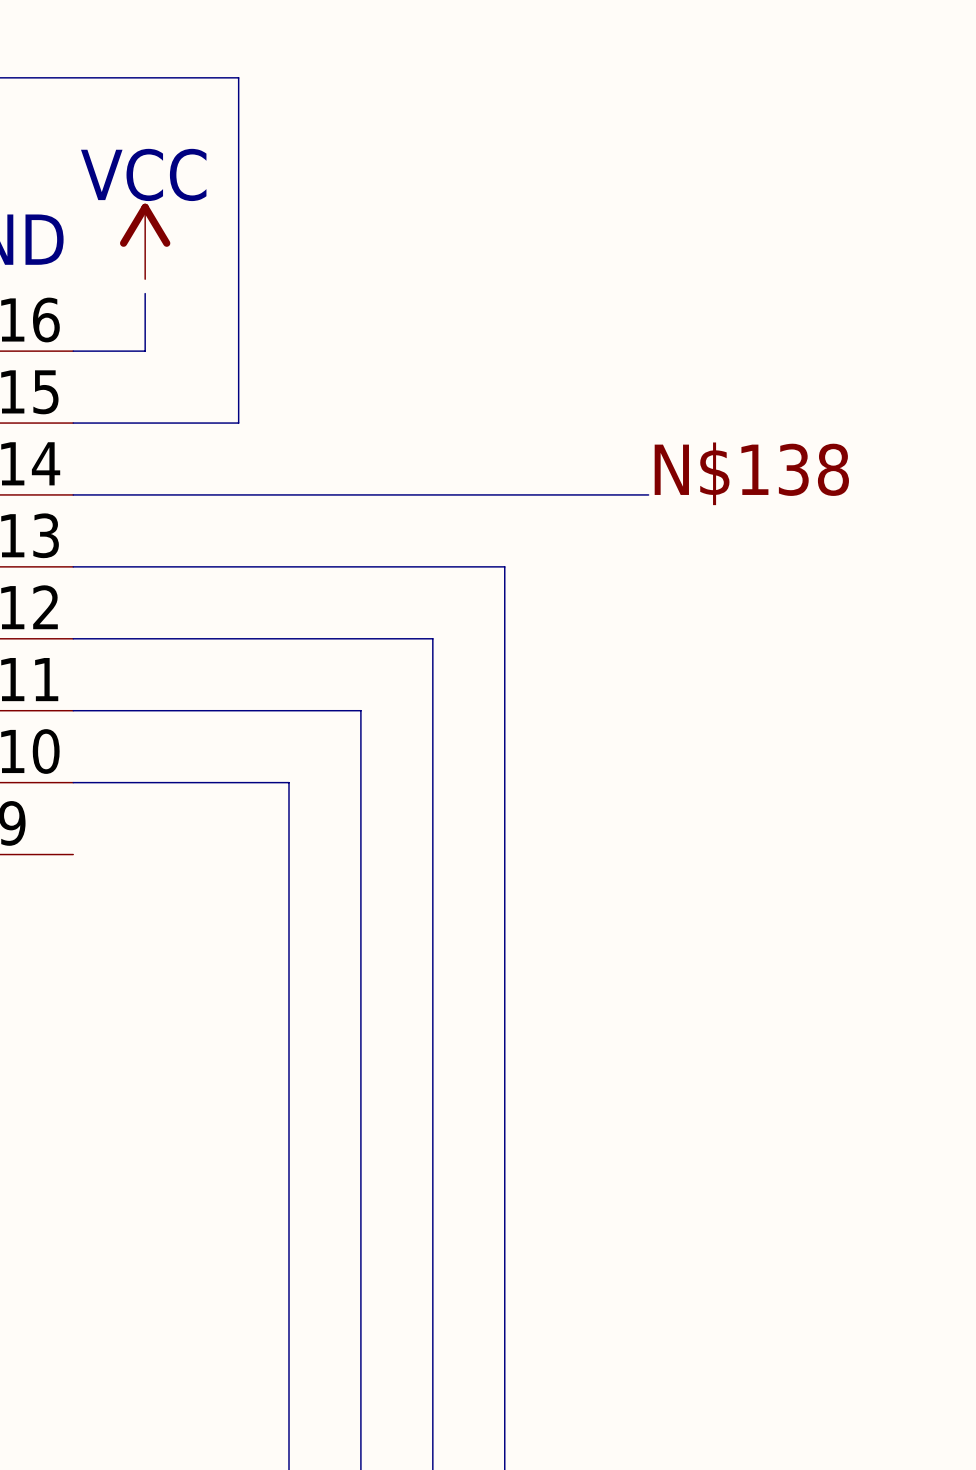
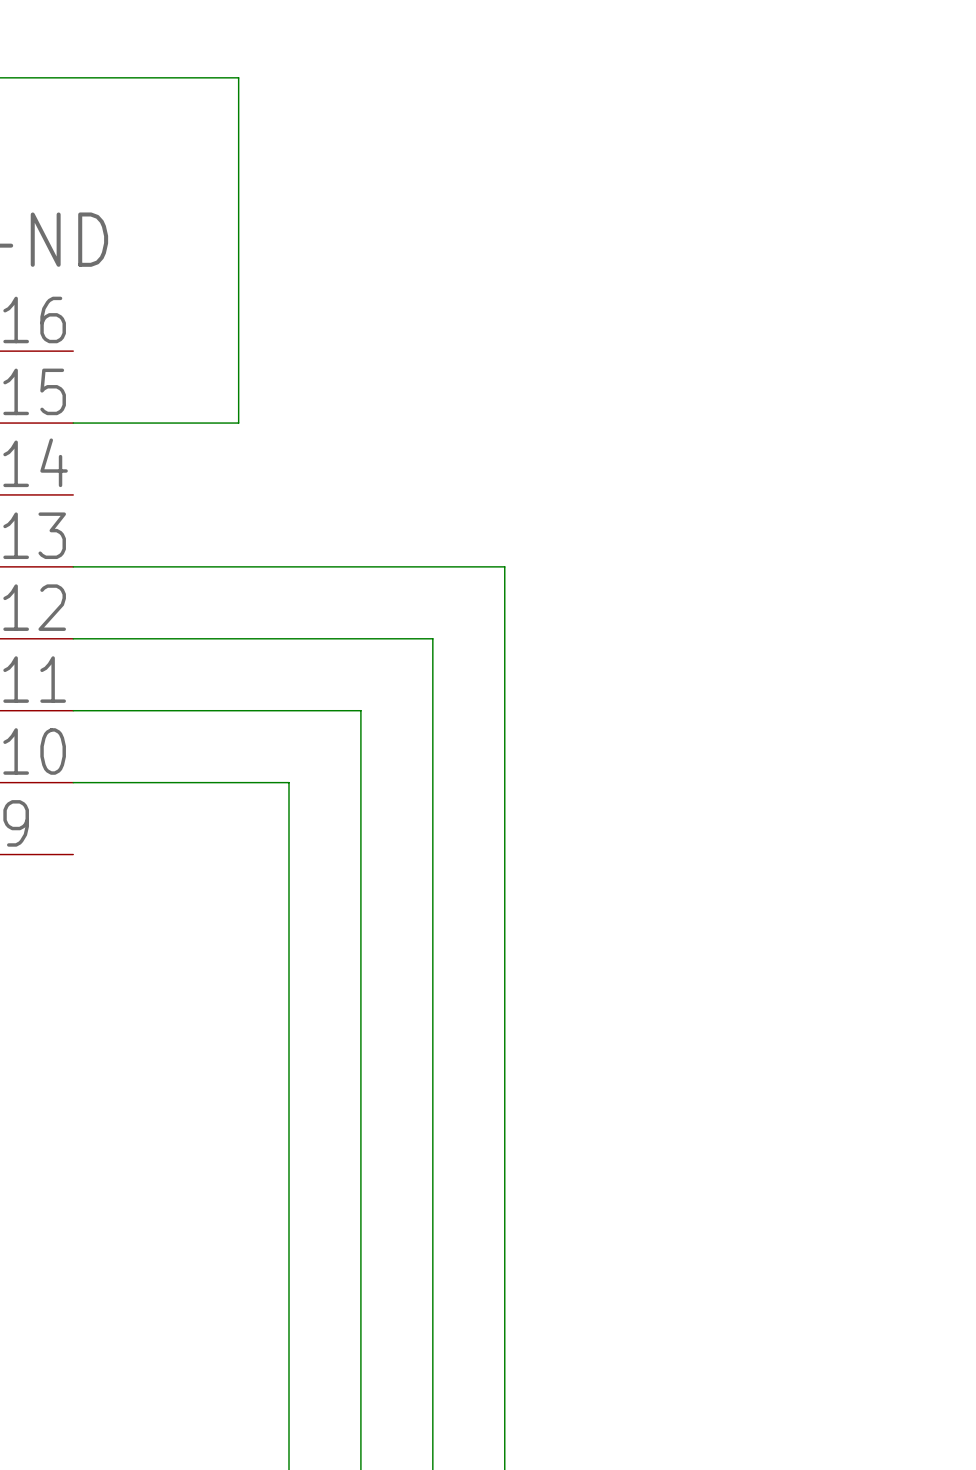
power symbol: VCC (145, 241) -> none
wire: (145, 293) (145, 351) (73, 351) -> none
label: N$138 (751, 473) -> none
wire: (73, 494) (648, 494) -> none

